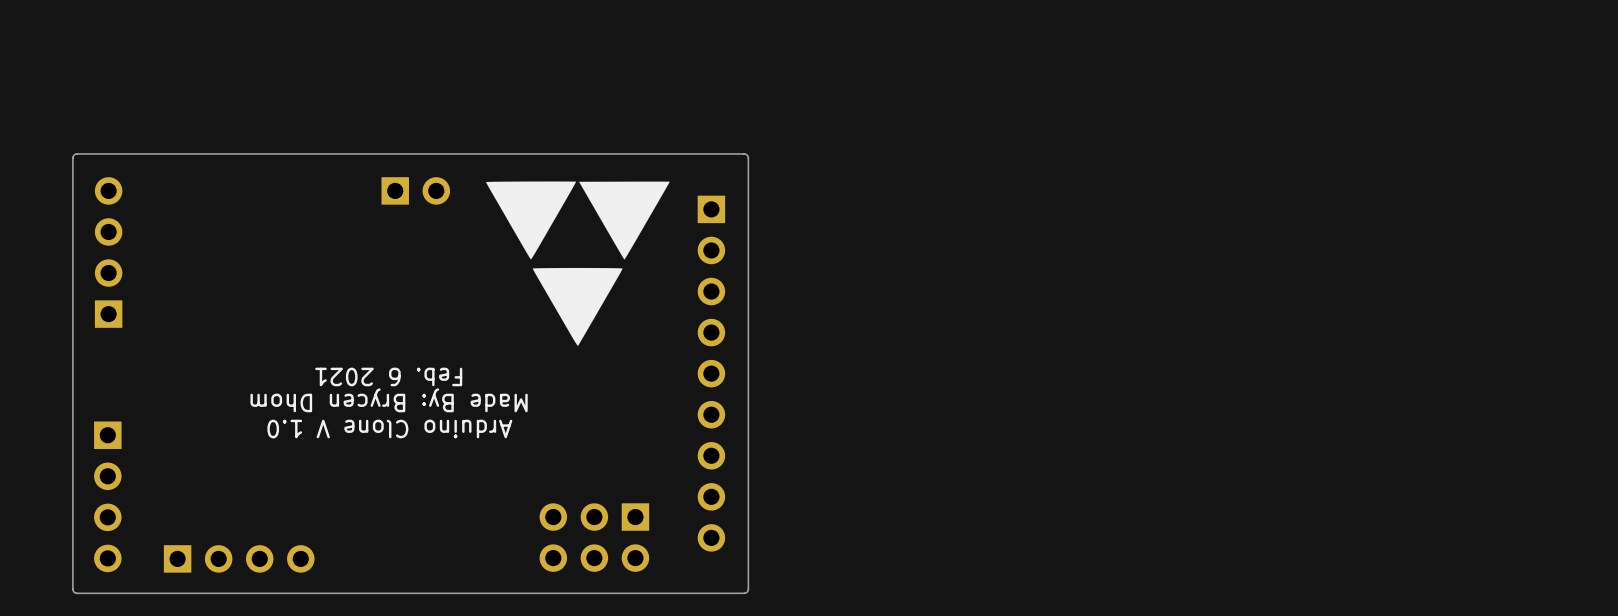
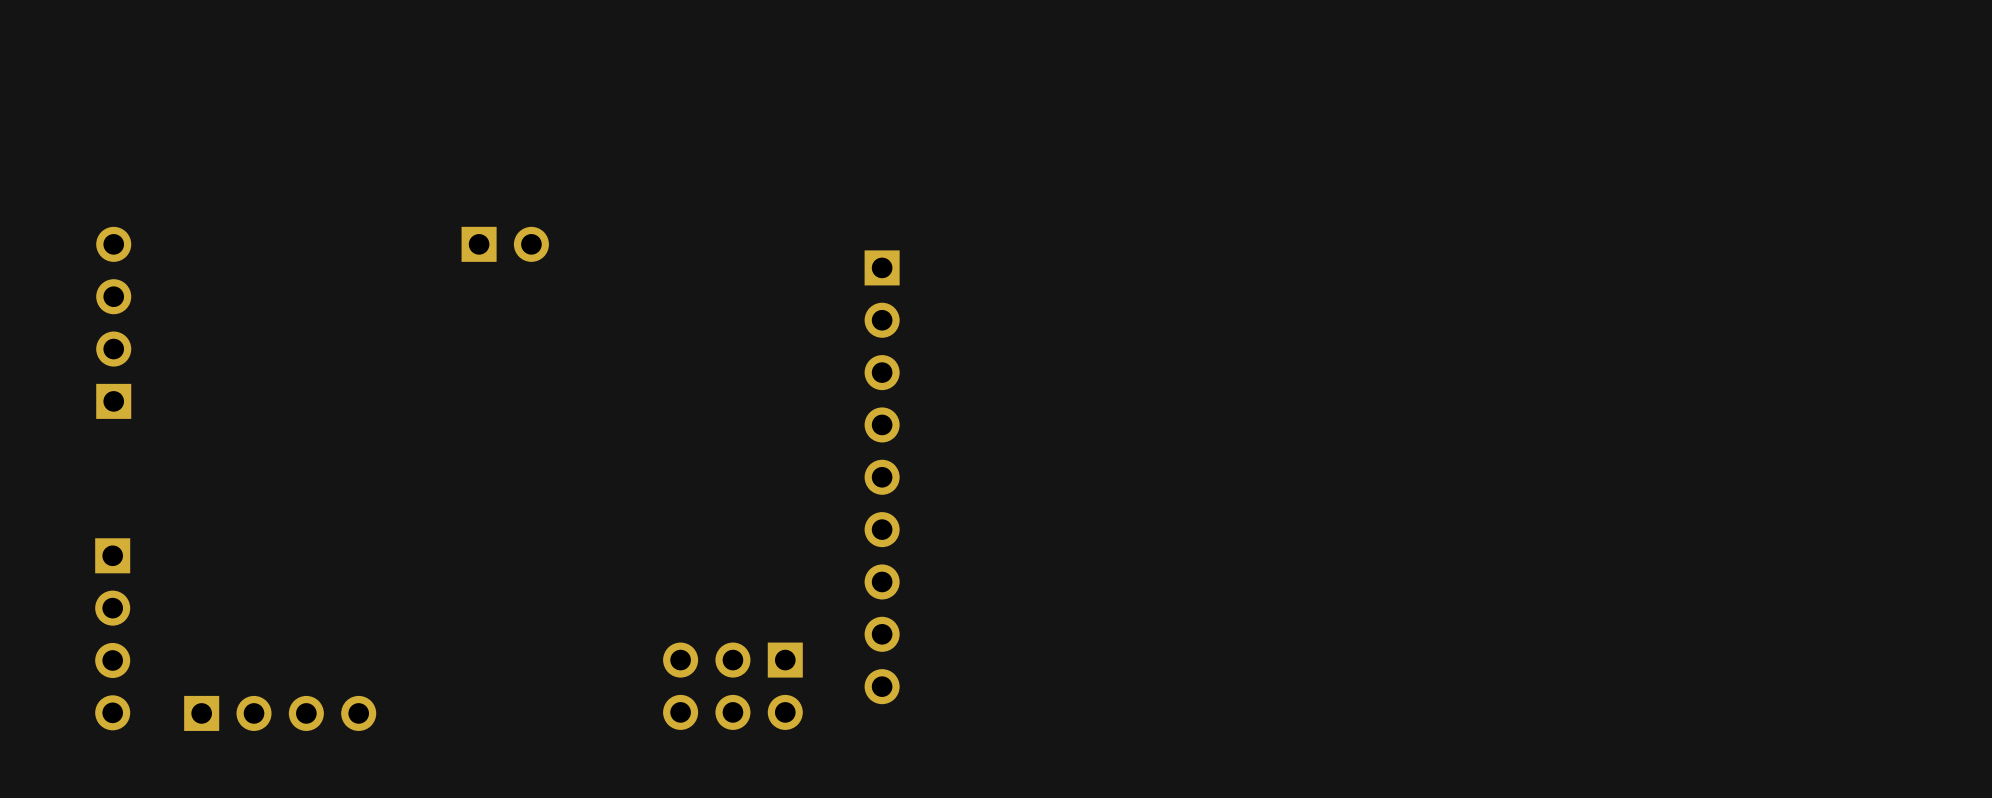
board edge: (744, 153) (74, 154) (72, 158) (73, 591) (77, 593) (746, 592) (748, 589) (748, 158) (744, 153) -> none
drawing: [486, 181, 670, 346] -> none
text: Feb. 6 2021 (388, 376) -> none
text: Made By: Brycen Dhom (389, 400) -> none
text: Arduino Clone V 1.0 (389, 429) -> none

